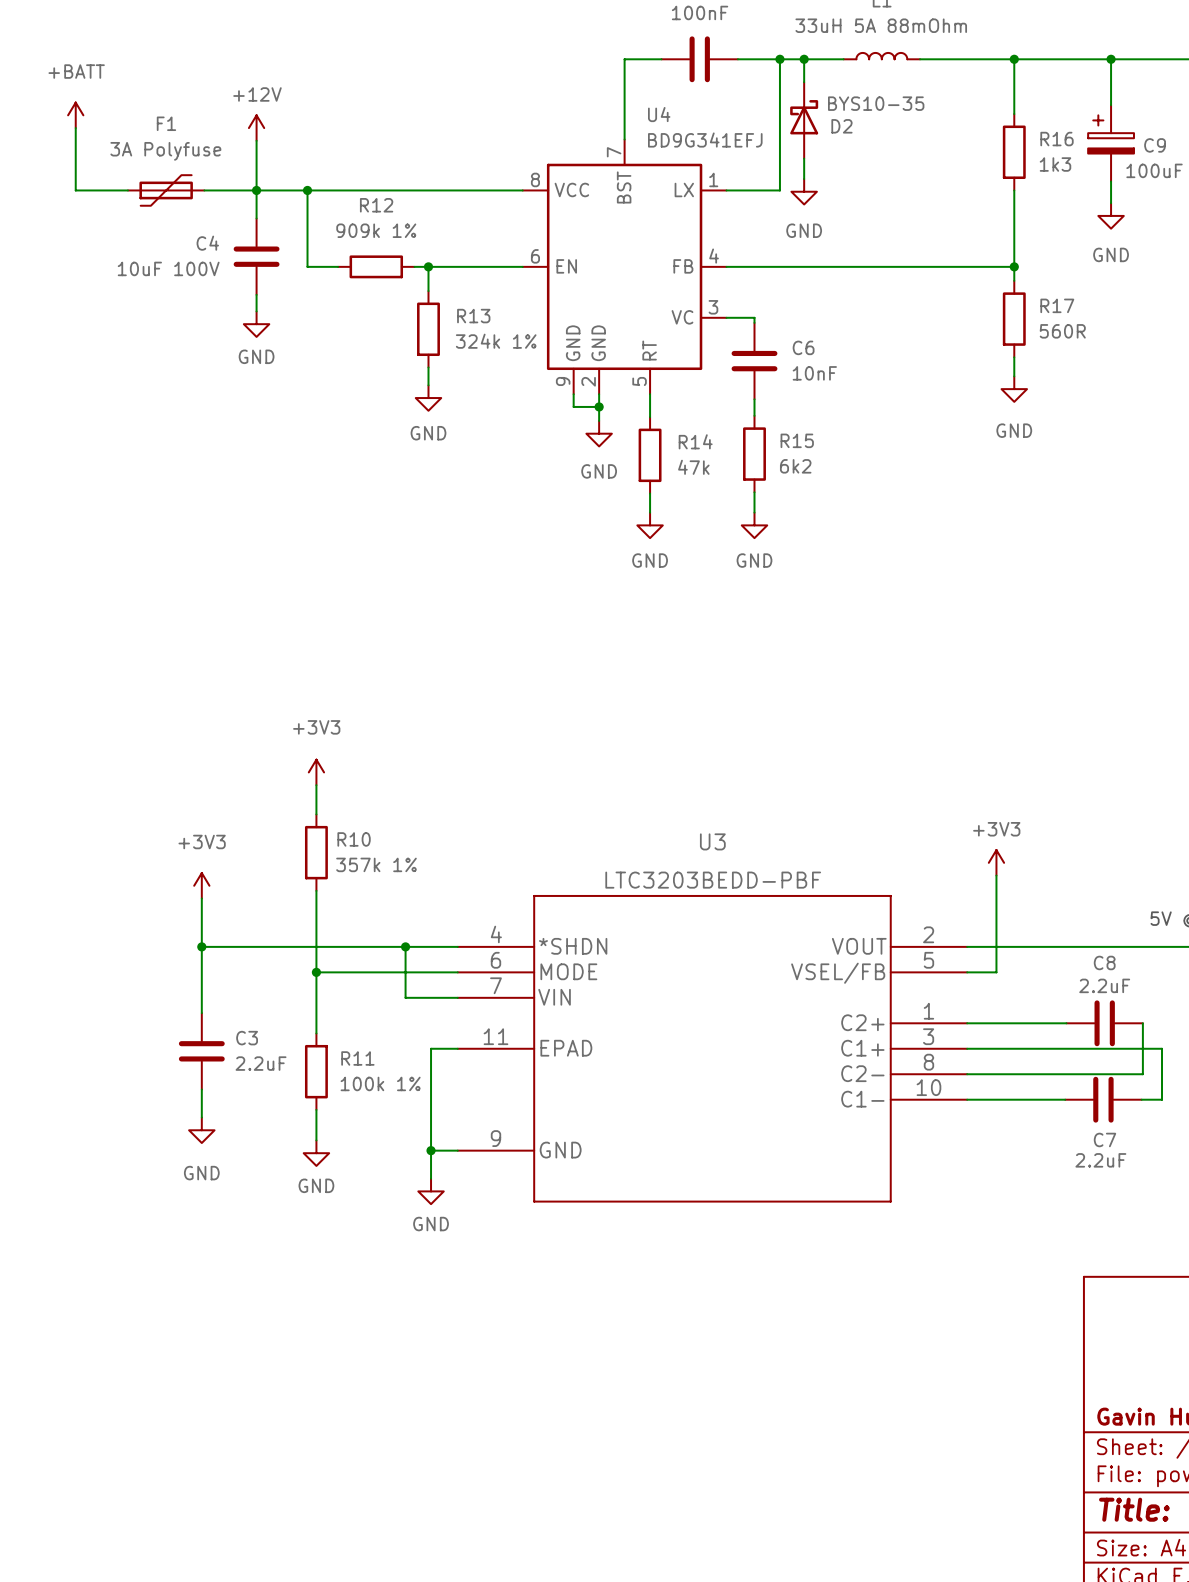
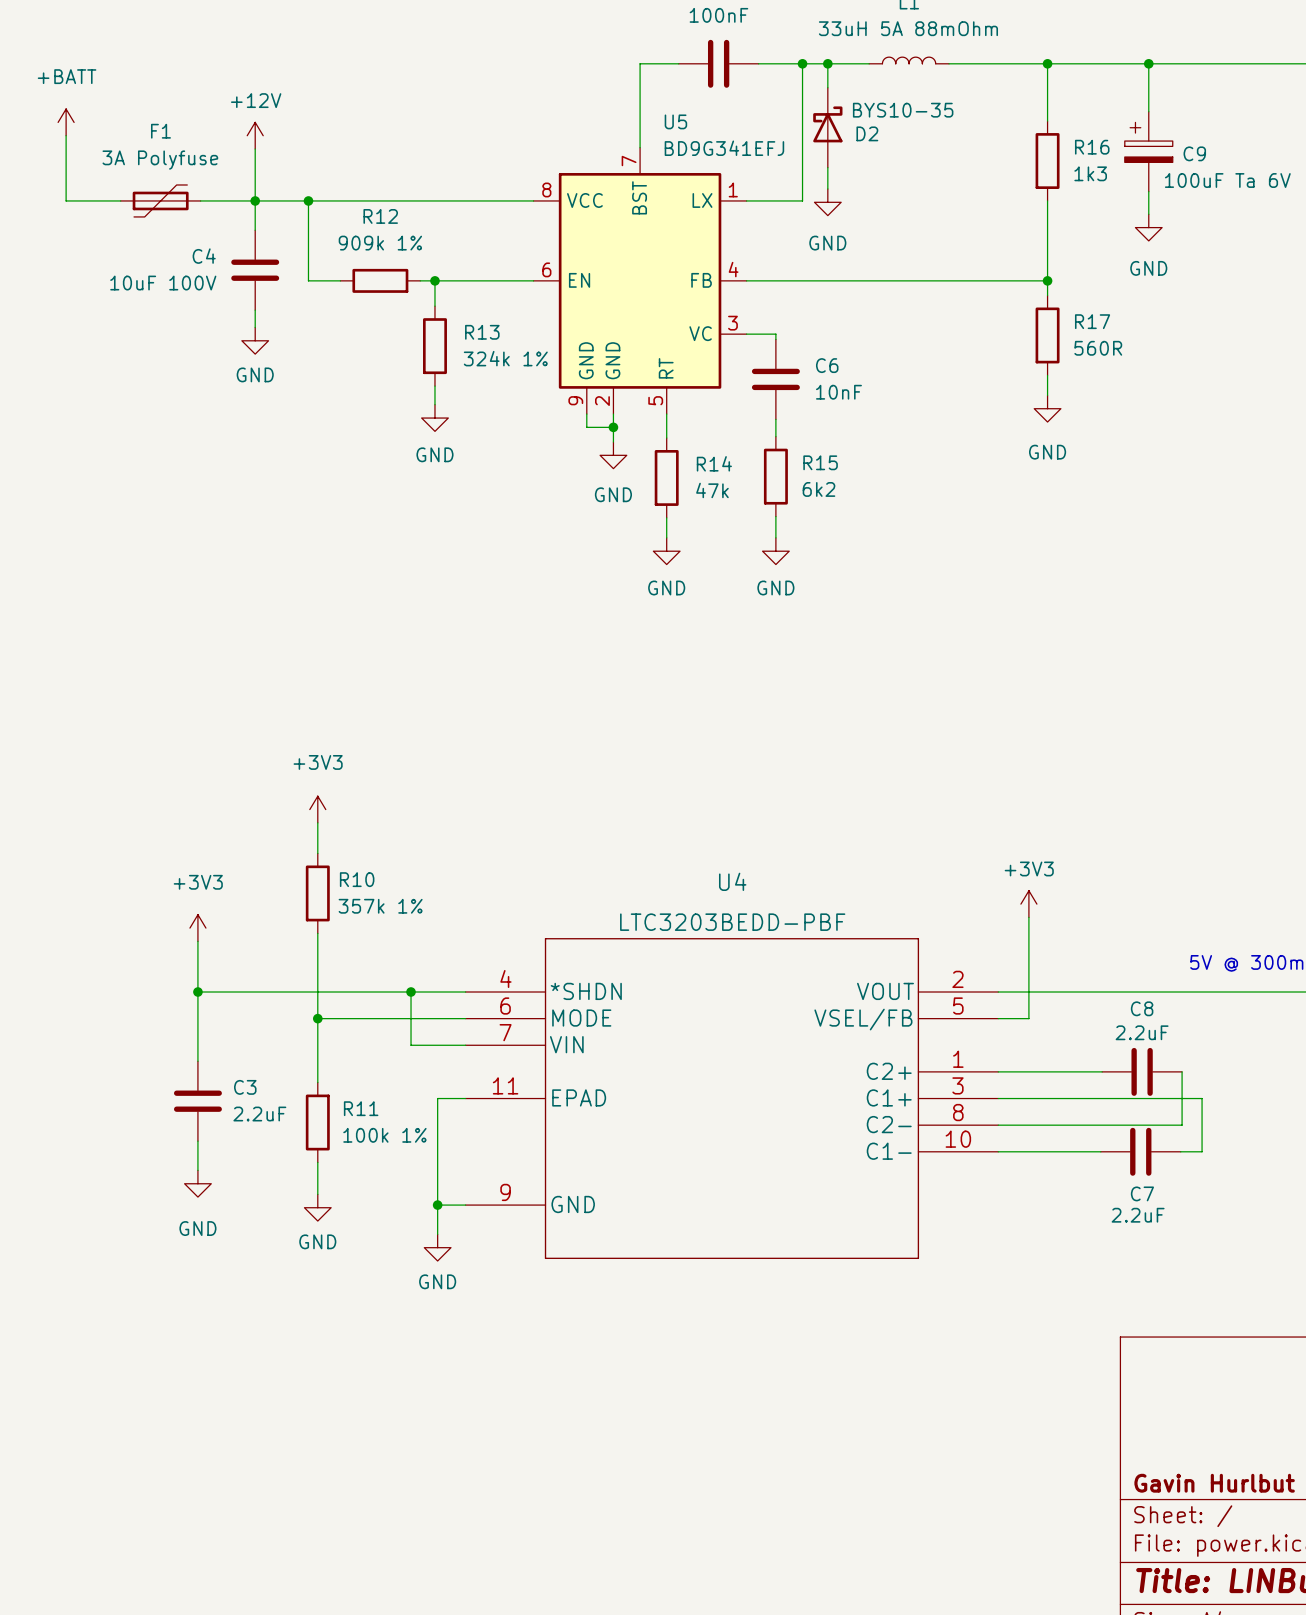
U4 name: U4 (659, 114) -> U5 (675, 121)
U3 name: U3 (712, 841) -> U4 (732, 881)

